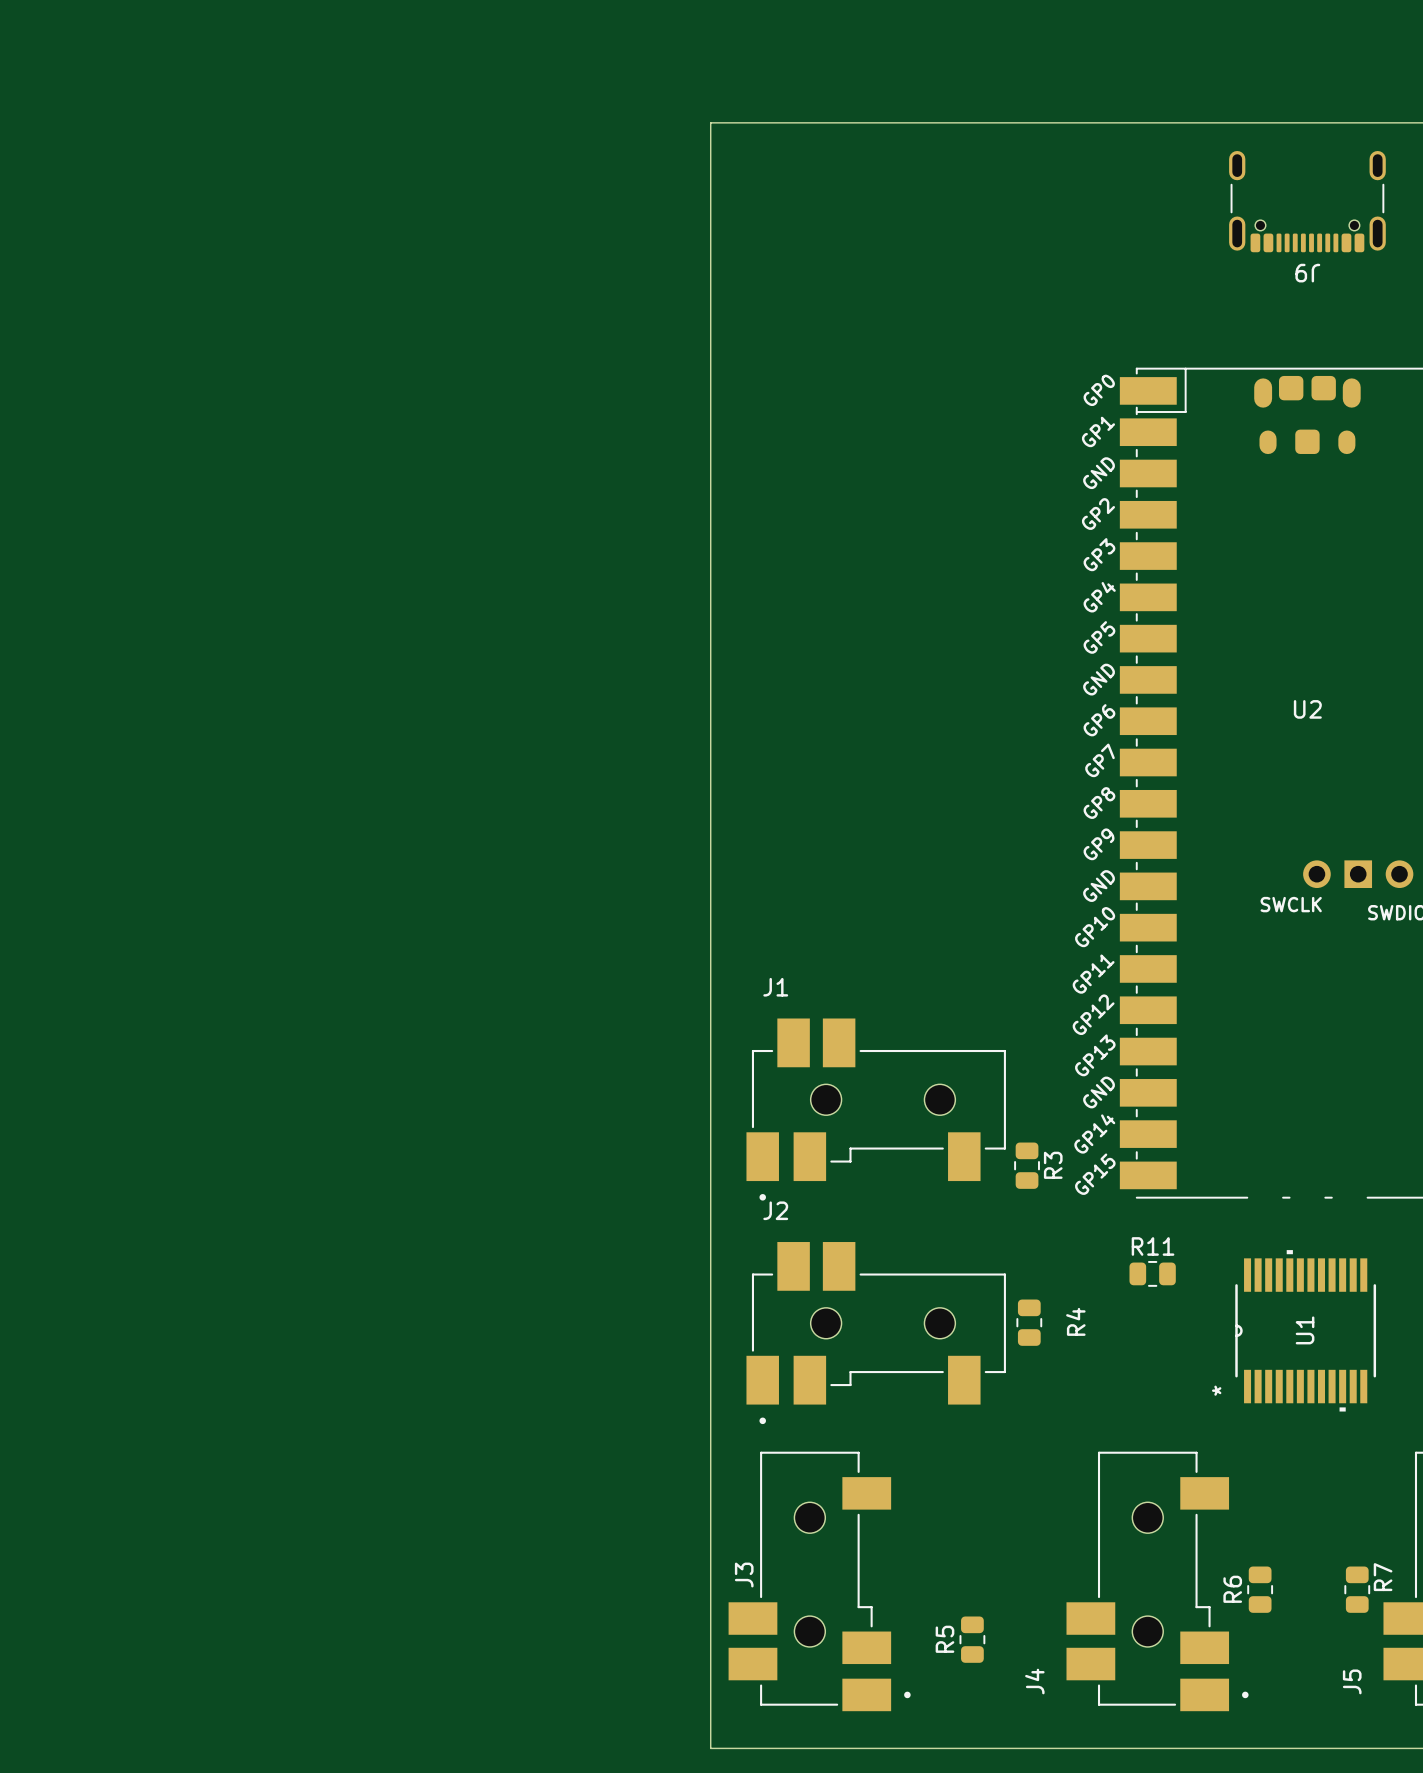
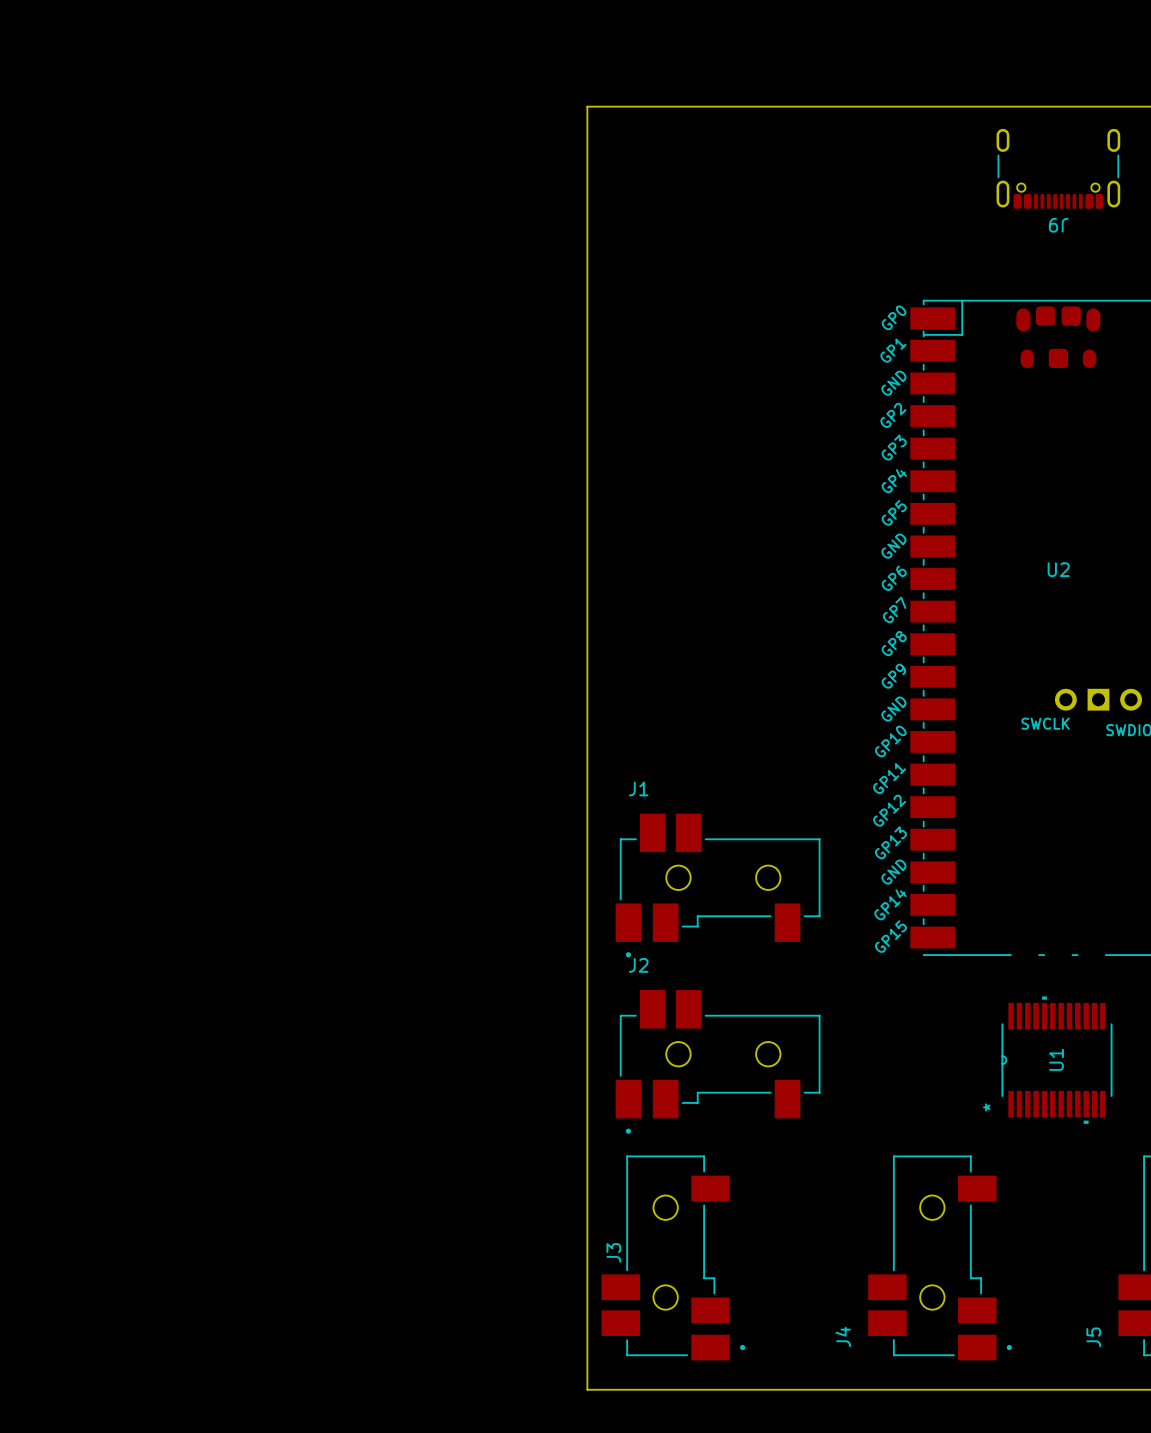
R3: (1027, 1165) -> none
R11: (1152, 1273) -> none
R4: (1029, 1322) -> none
R6: (1260, 1589) -> none
R7: (1357, 1589) -> none
R5: (972, 1639) -> none

